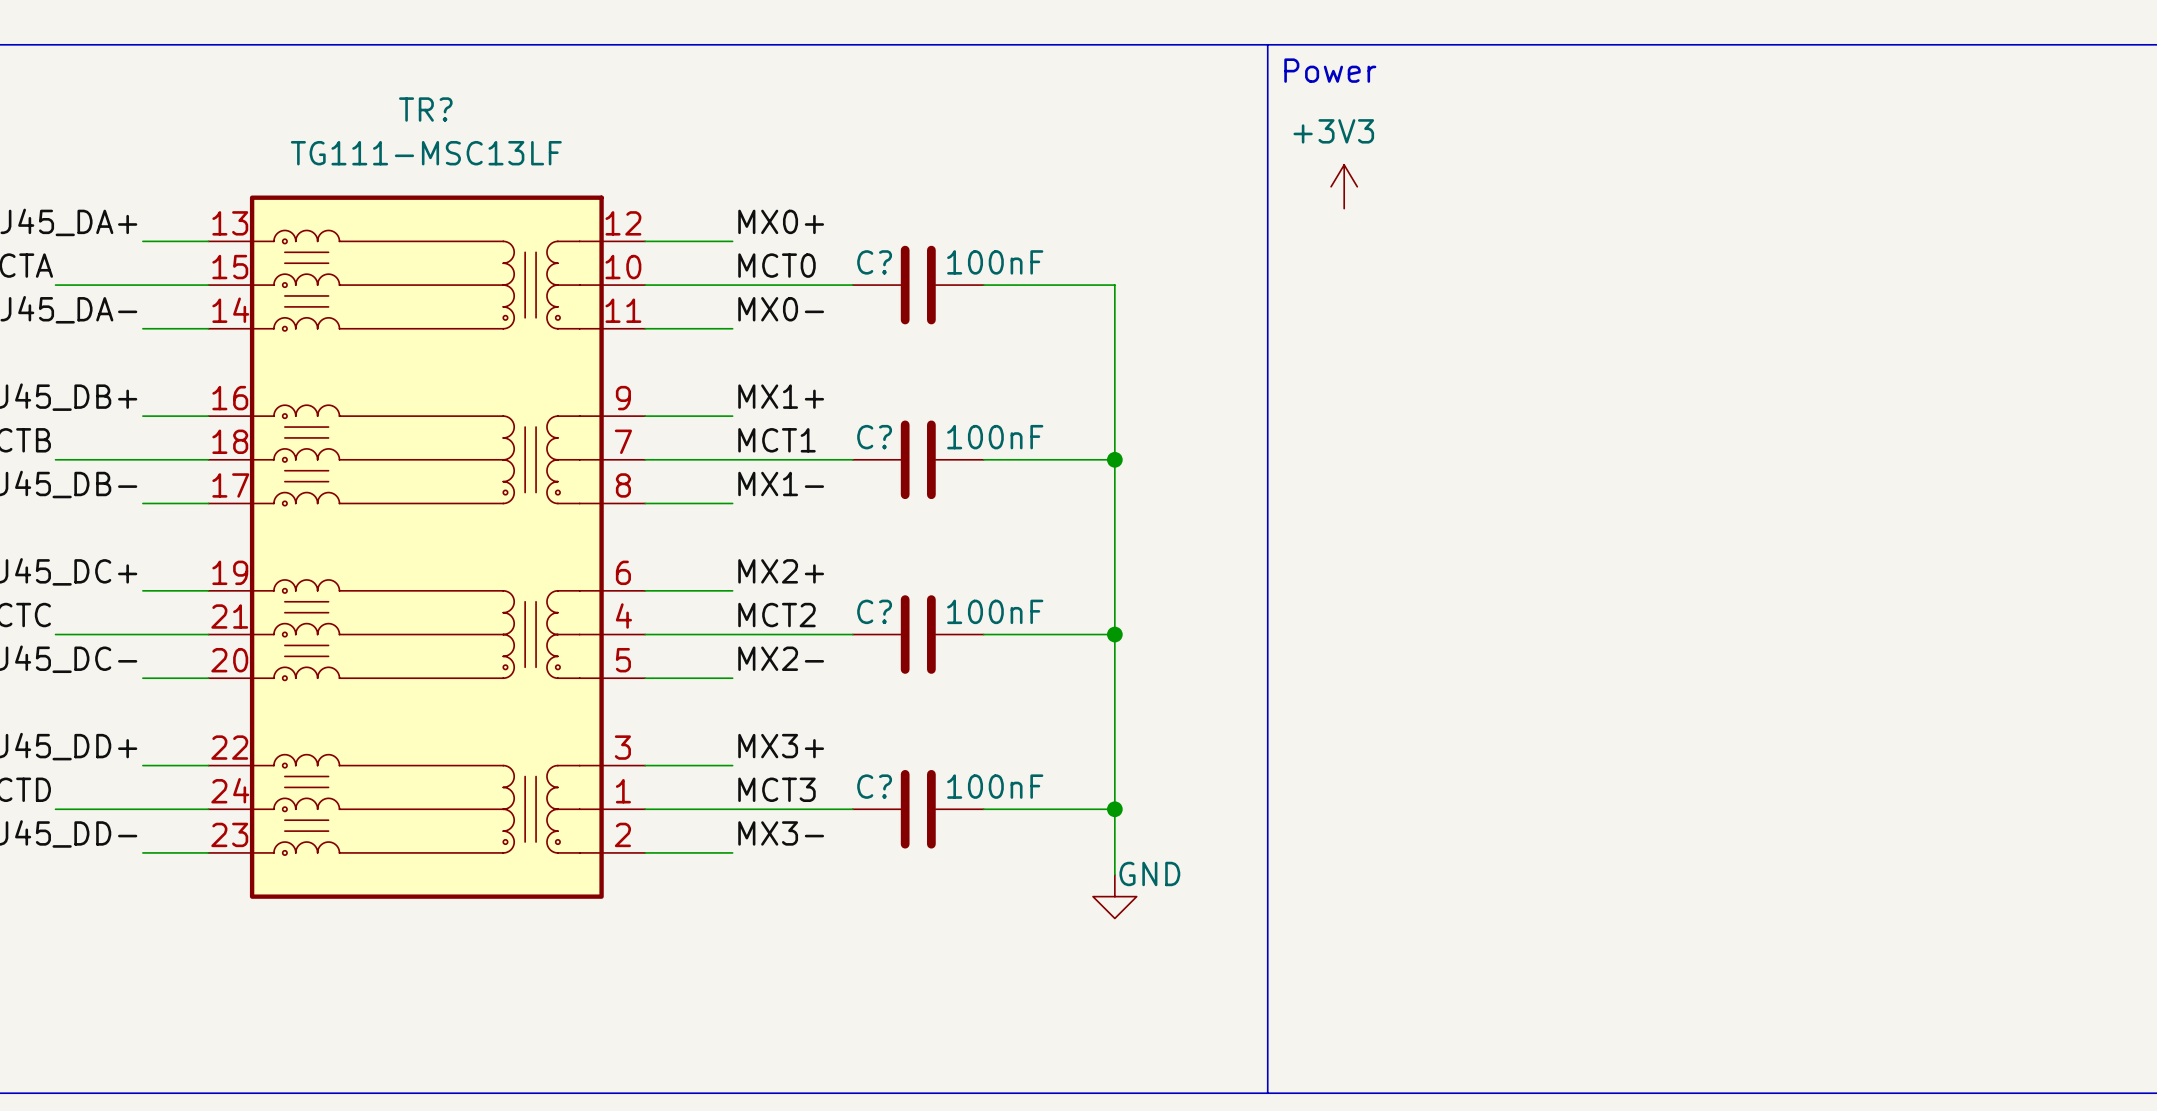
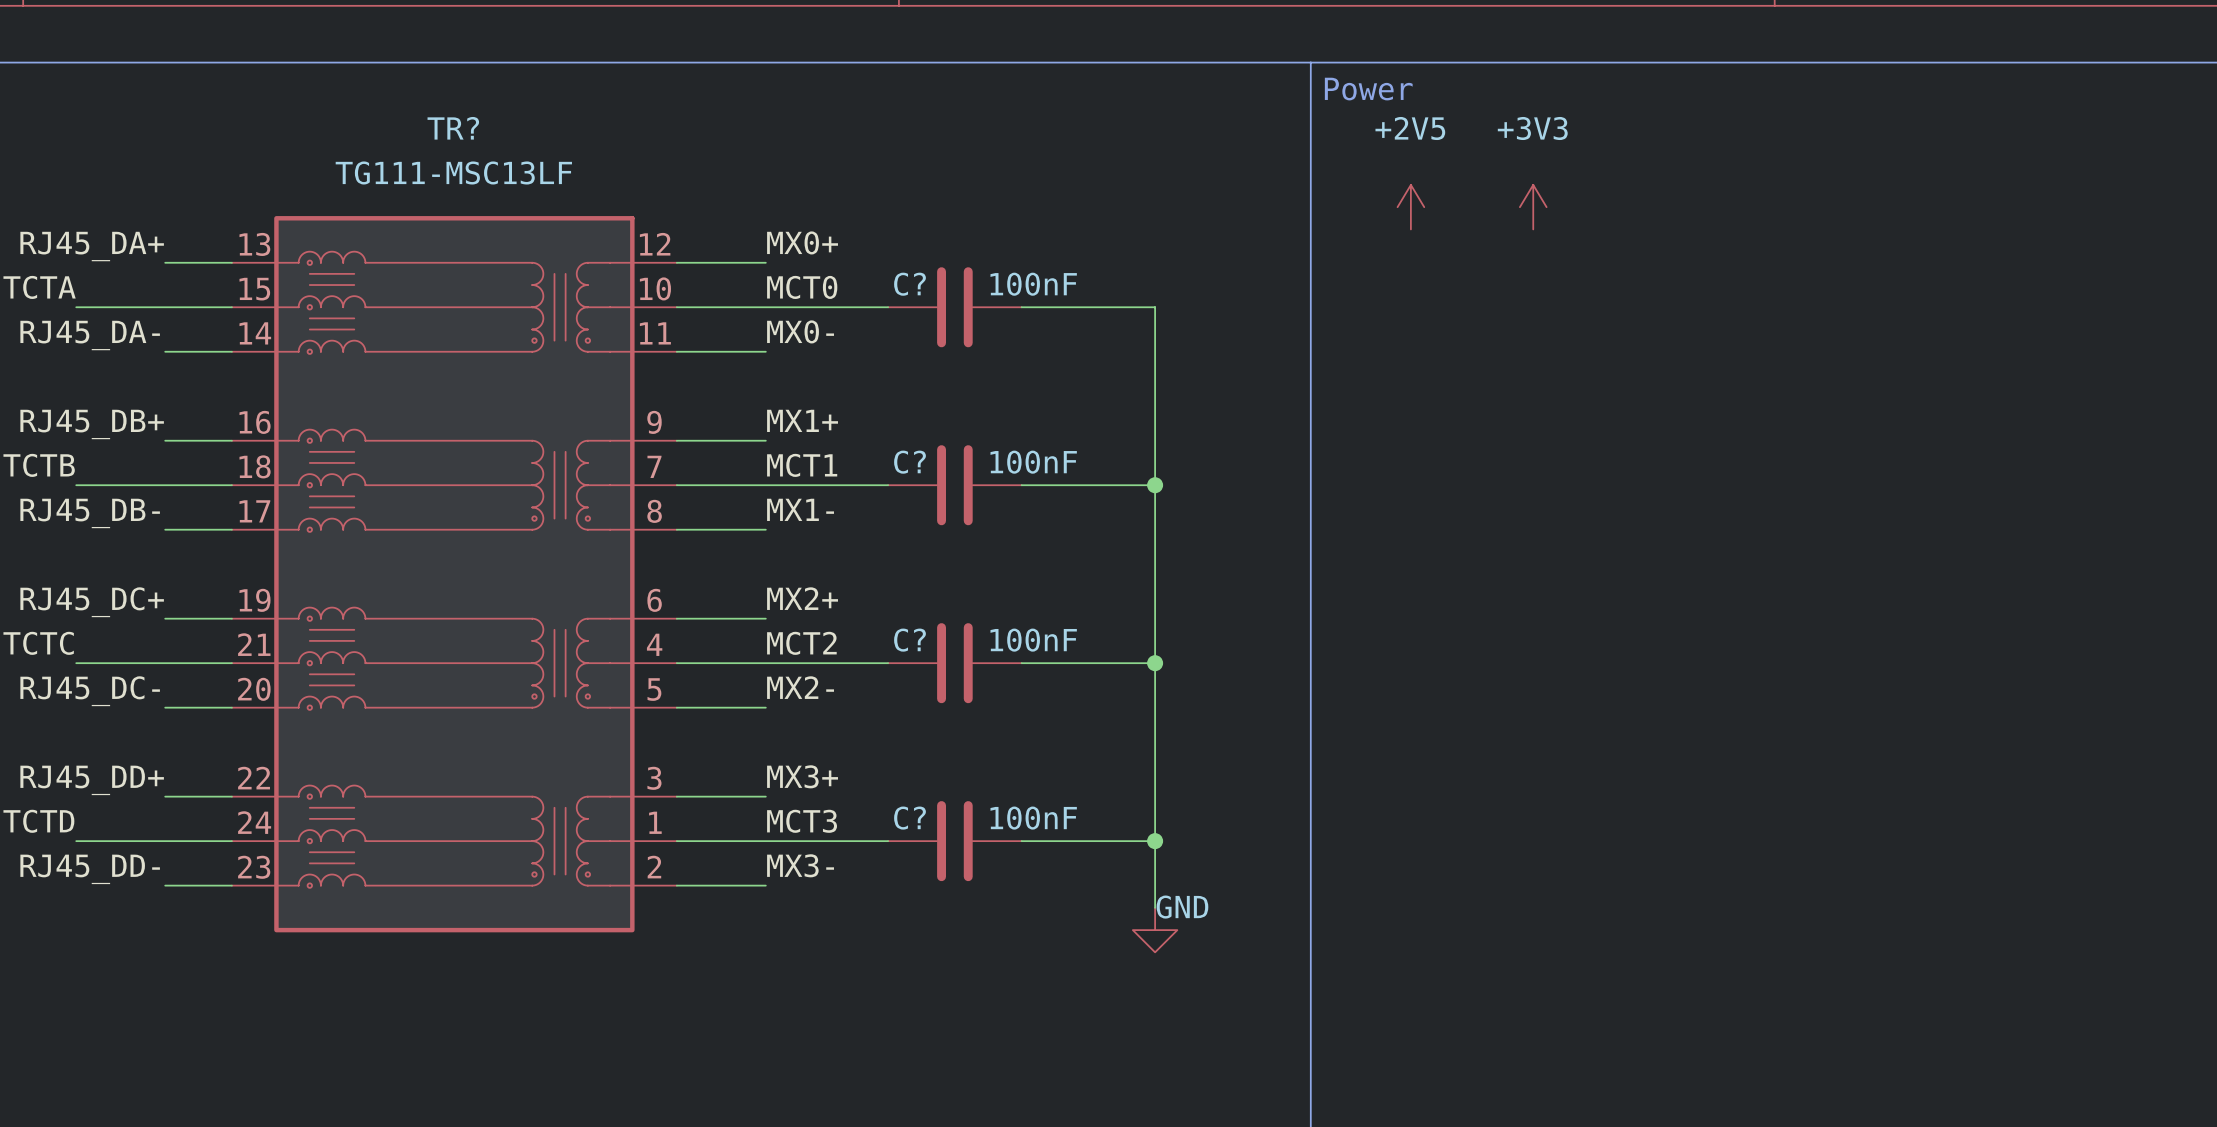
power symbol text position: +3V3 (1333, 131) -> +3V3 (1532, 128)
power symbol position: +3V3 (1344, 186) -> +3V3 (1533, 207)
power symbol: none -> +2V5 (1410, 207)

